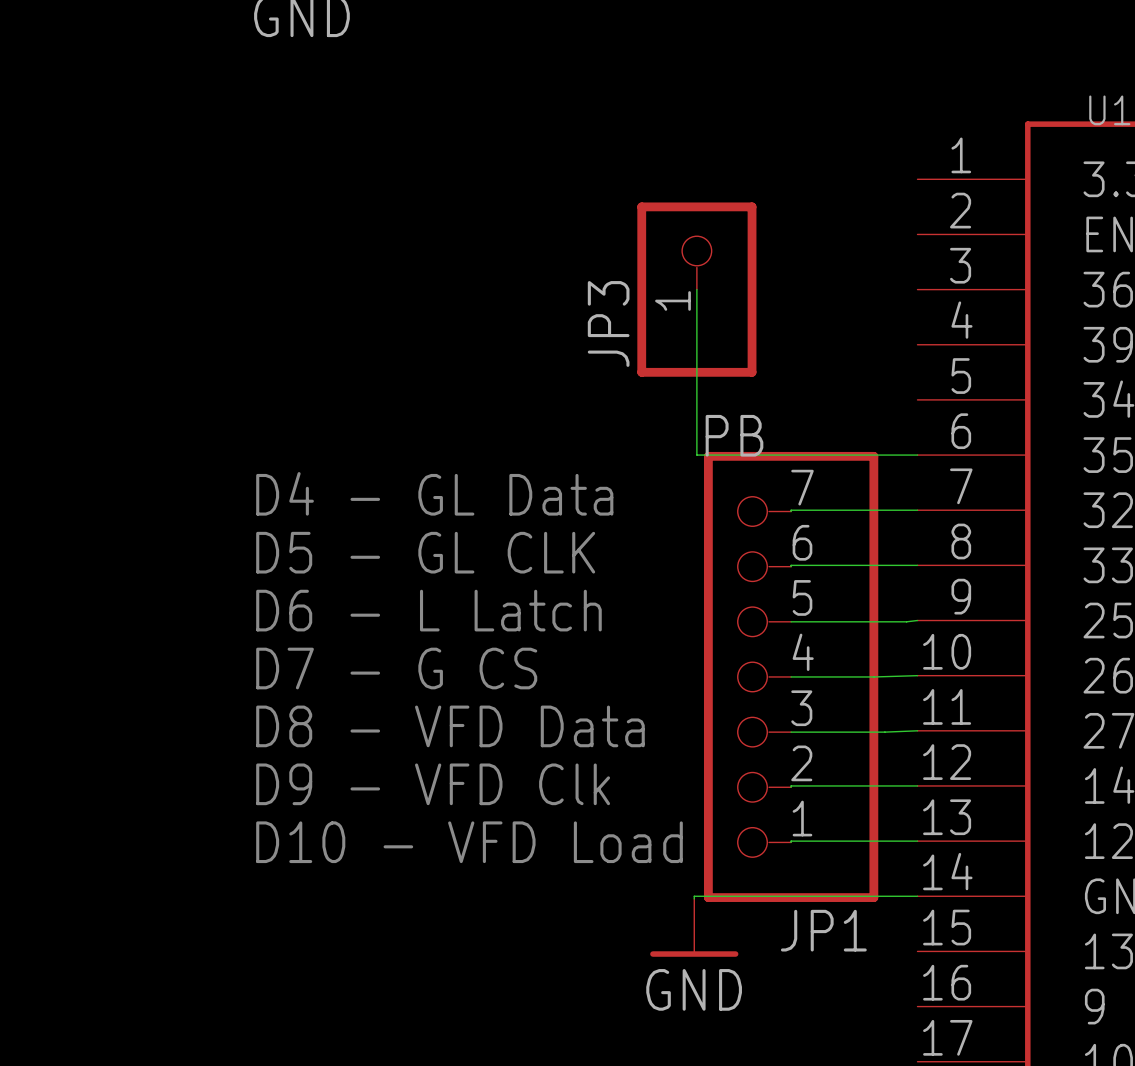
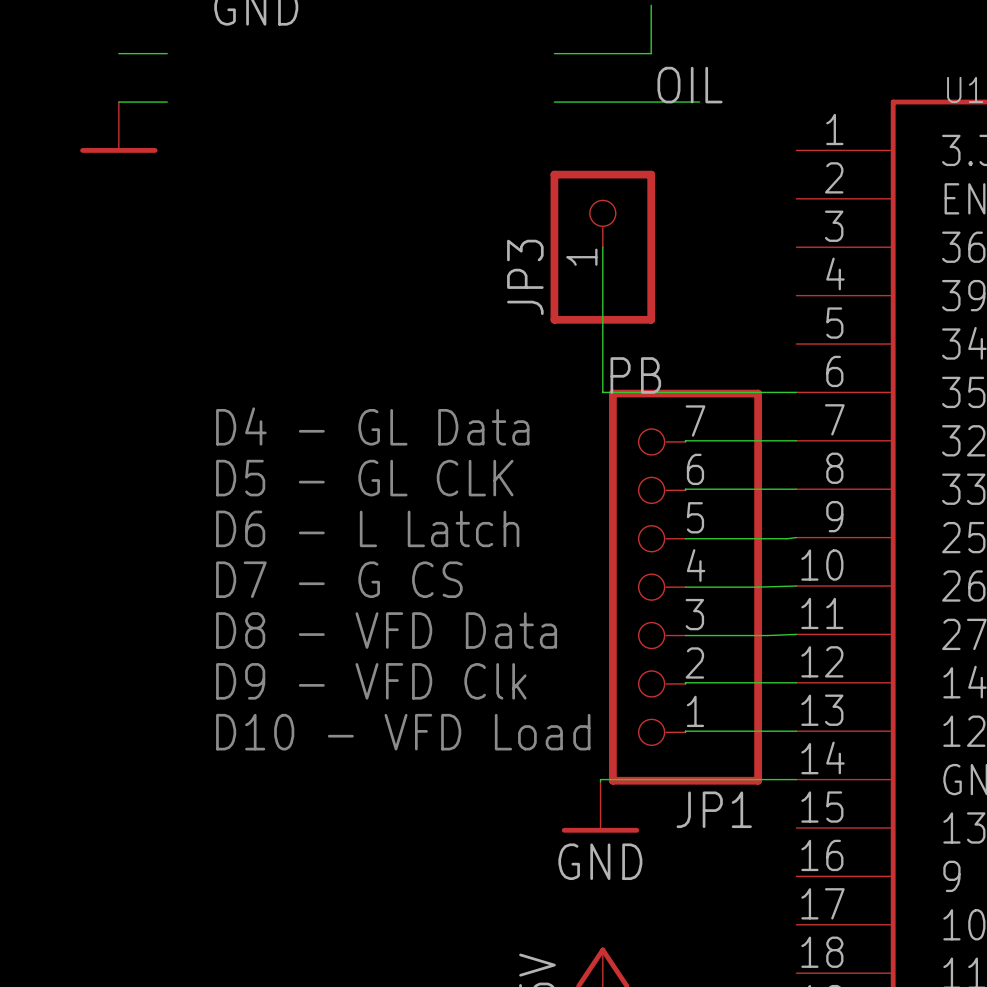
wire: none -> (651, 5) (651, 53) (554, 53)
wire: none -> (118, 53) (167, 53)
label: none -> OIL (690, 85)
wire: none -> (118, 102) (167, 102)
wire: none -> (554, 102) (699, 102)
power symbol: none -> (118, 127)

